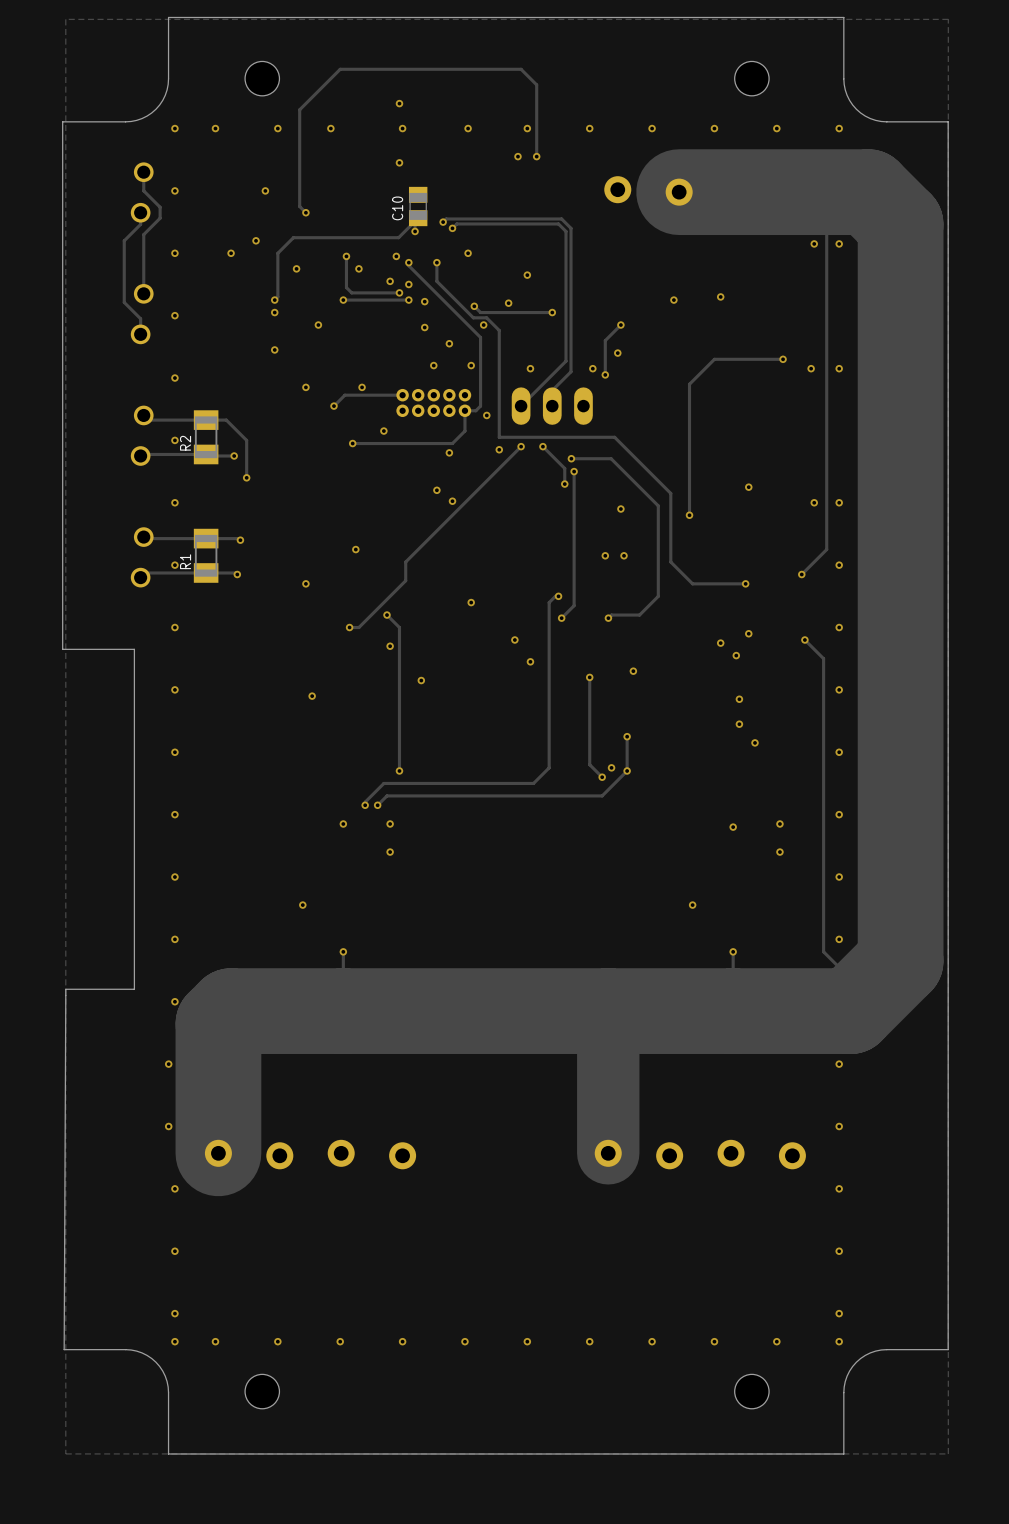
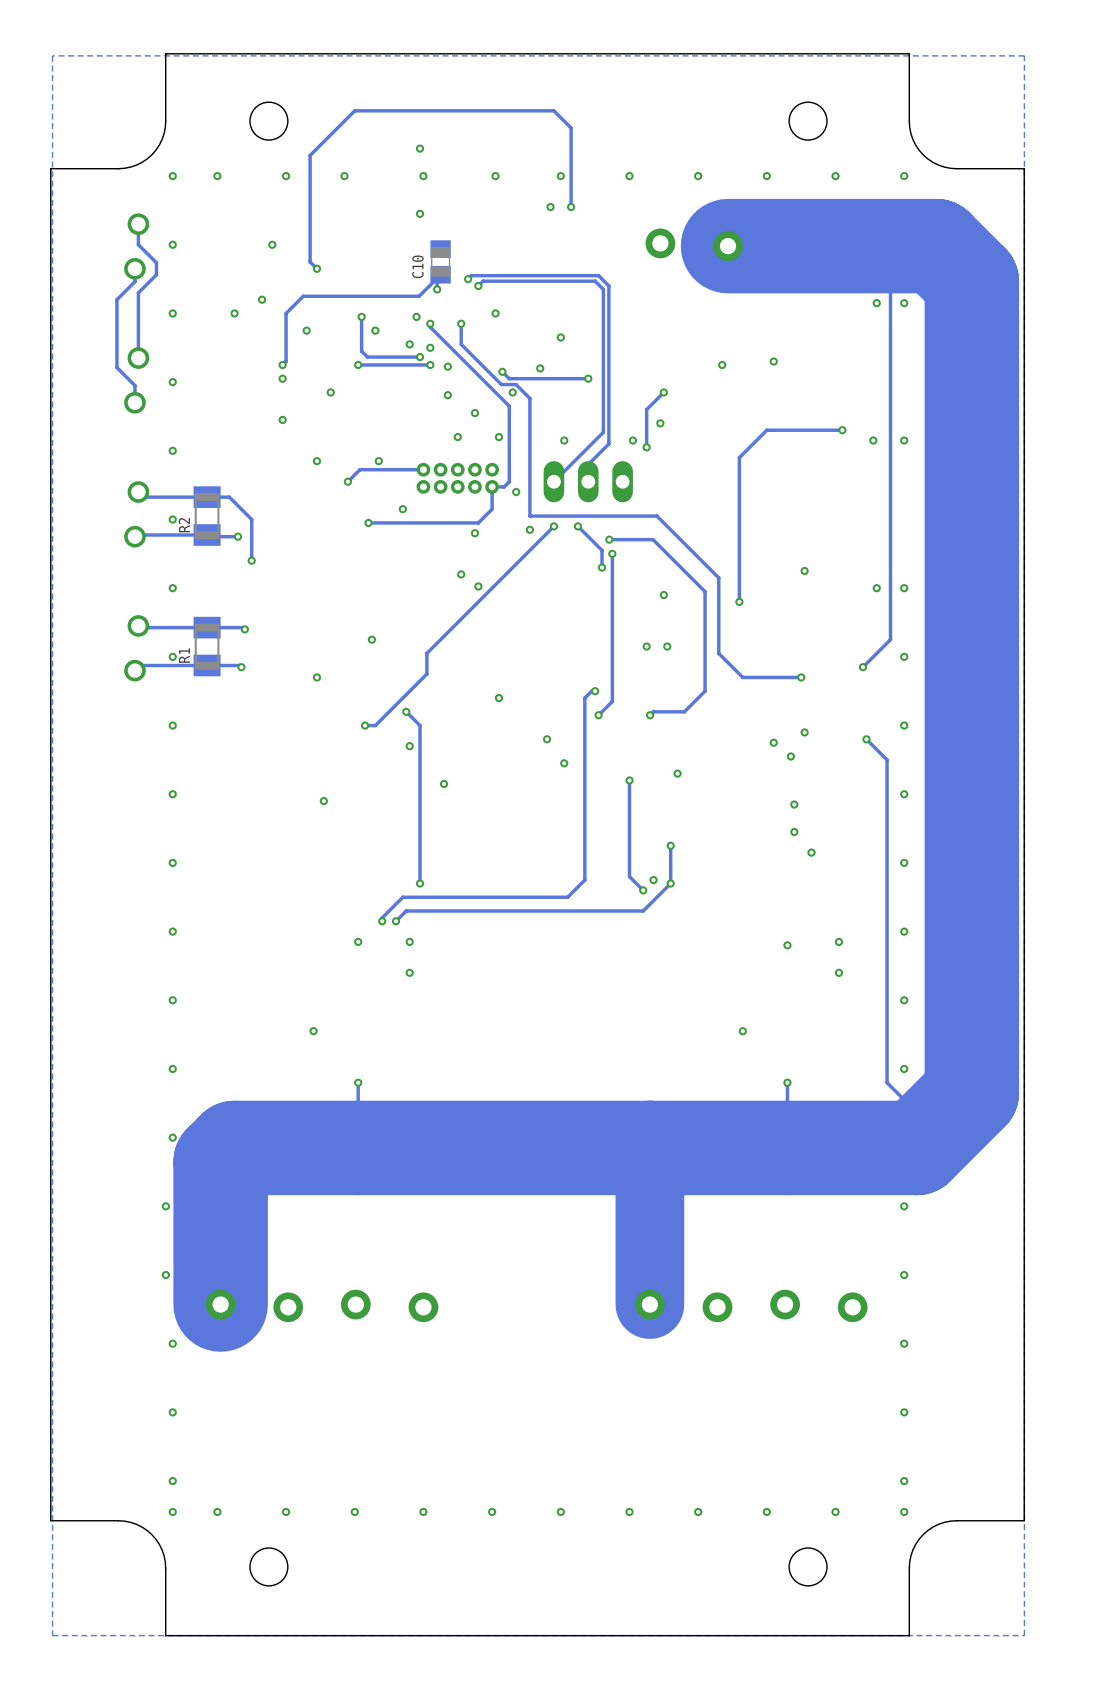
board edge: (64, 121) (62, 121) (62, 649) (134, 649) (134, 989) (65, 989) (64, 1349) -> (50, 168) (50, 1520)

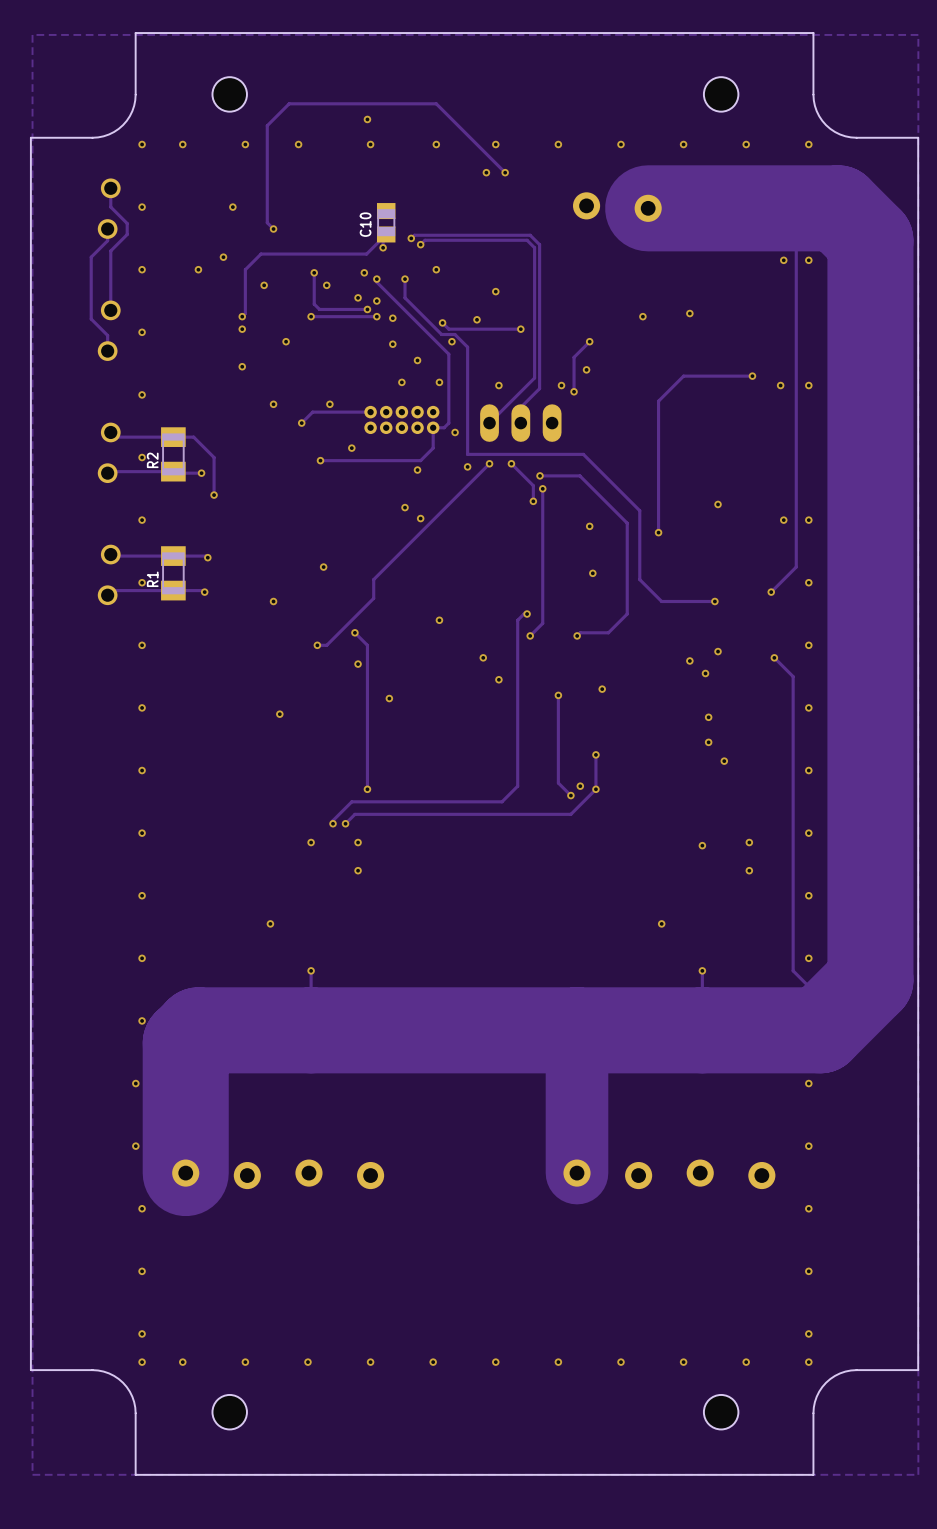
track: (334, 131) (354, 110) (553, 110) (571, 128) (571, 206) -> (289, 103) (436, 103) (505, 172)
via: (420, 213) -> none
via: (646, 646) -> none

